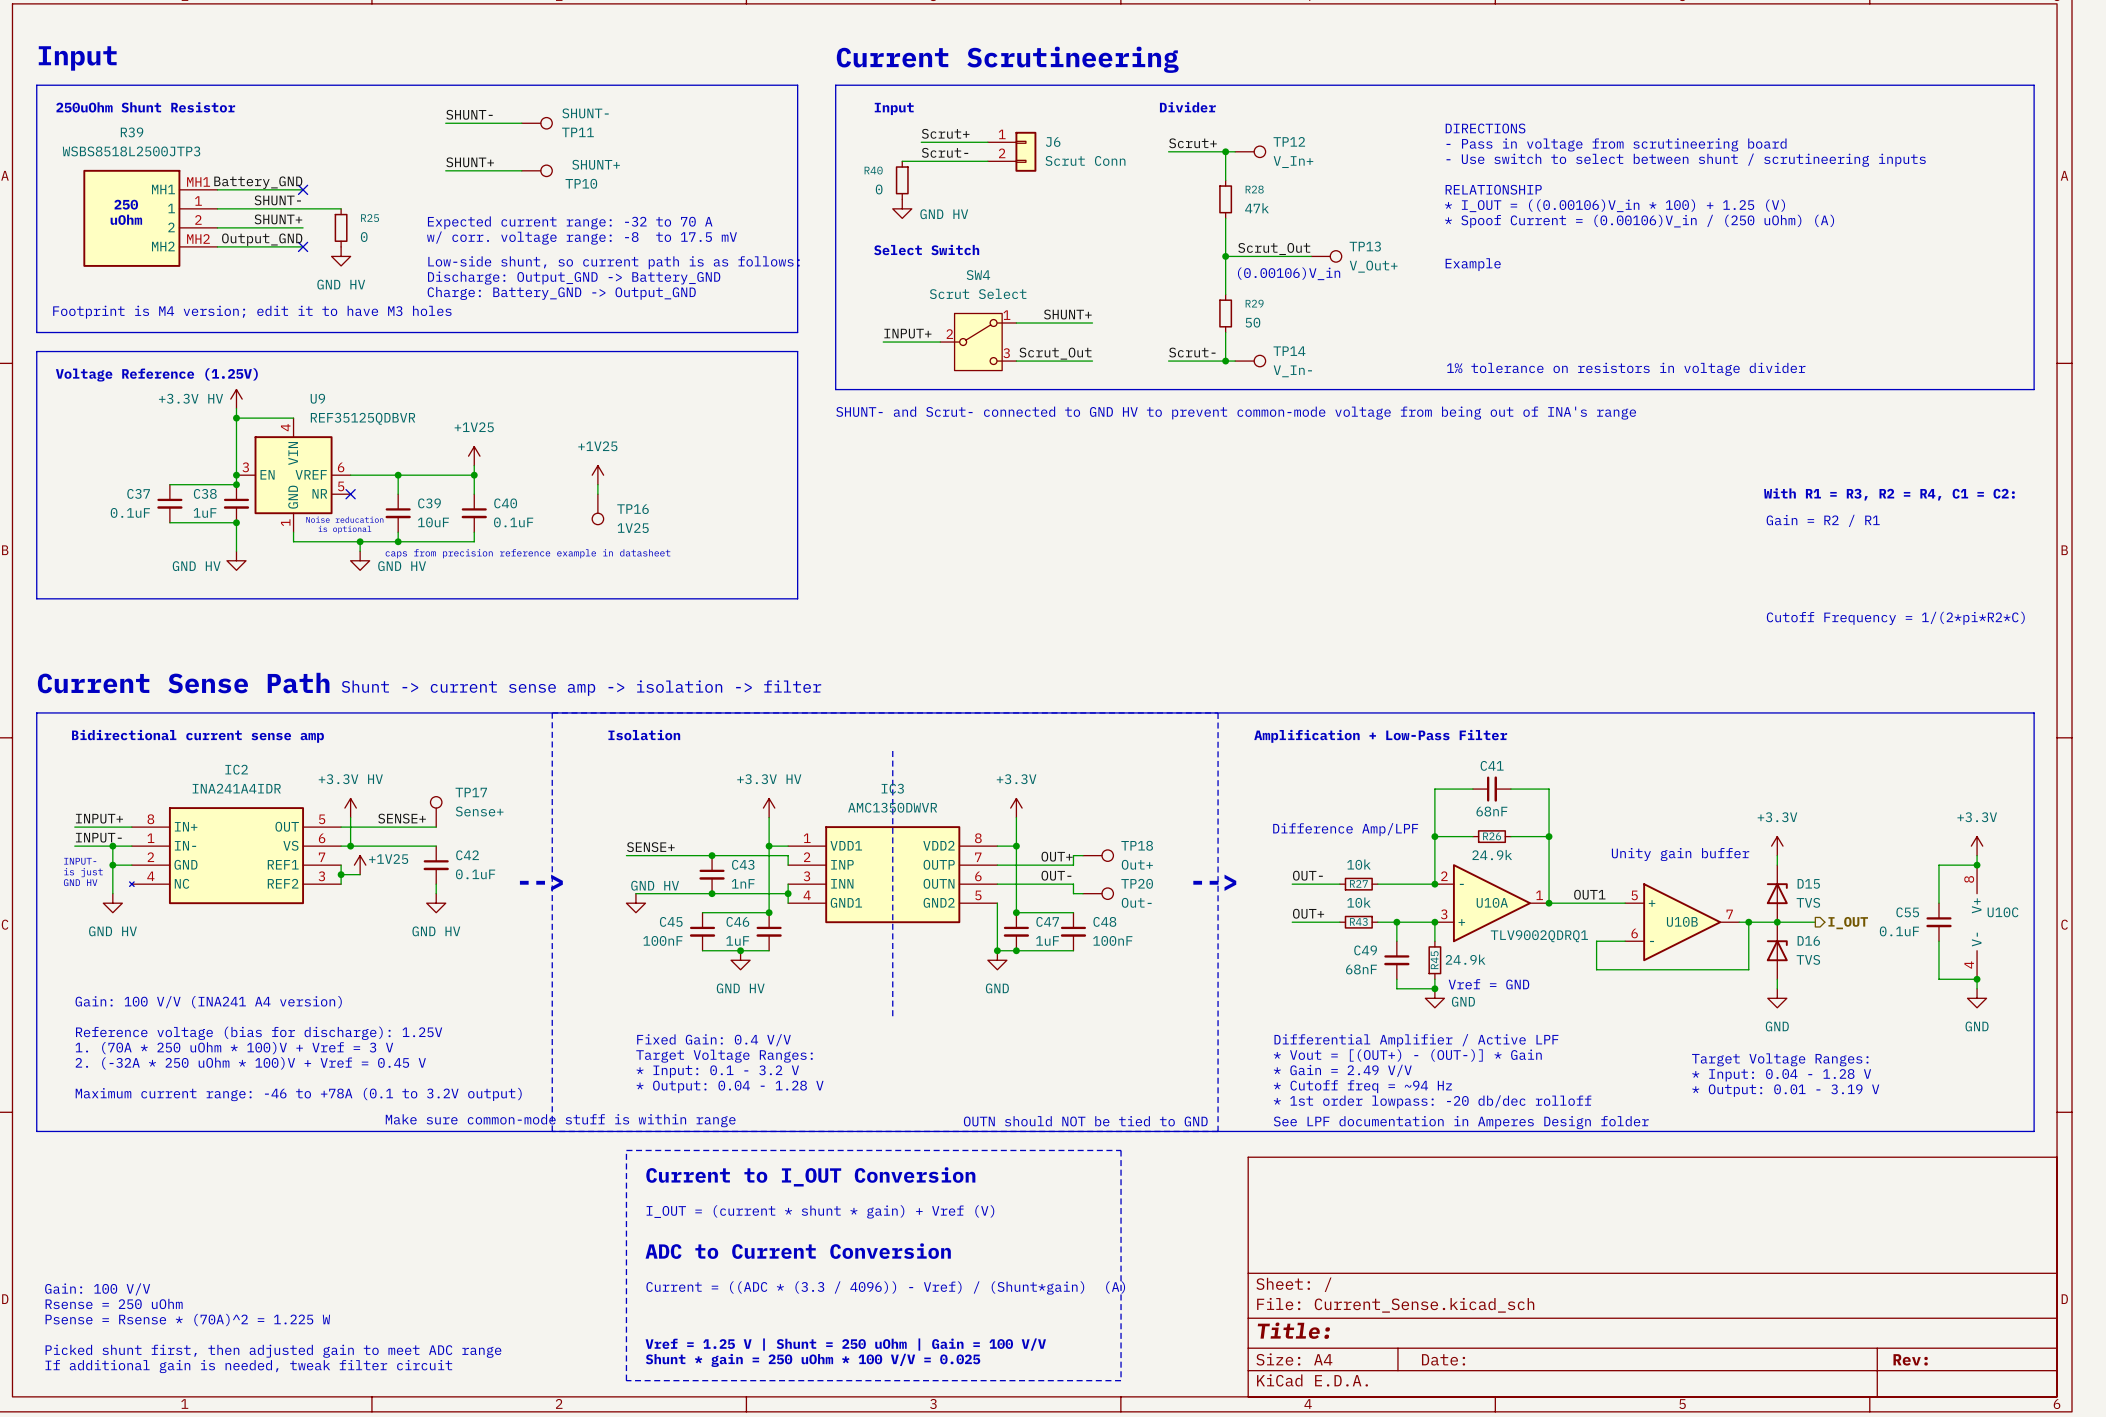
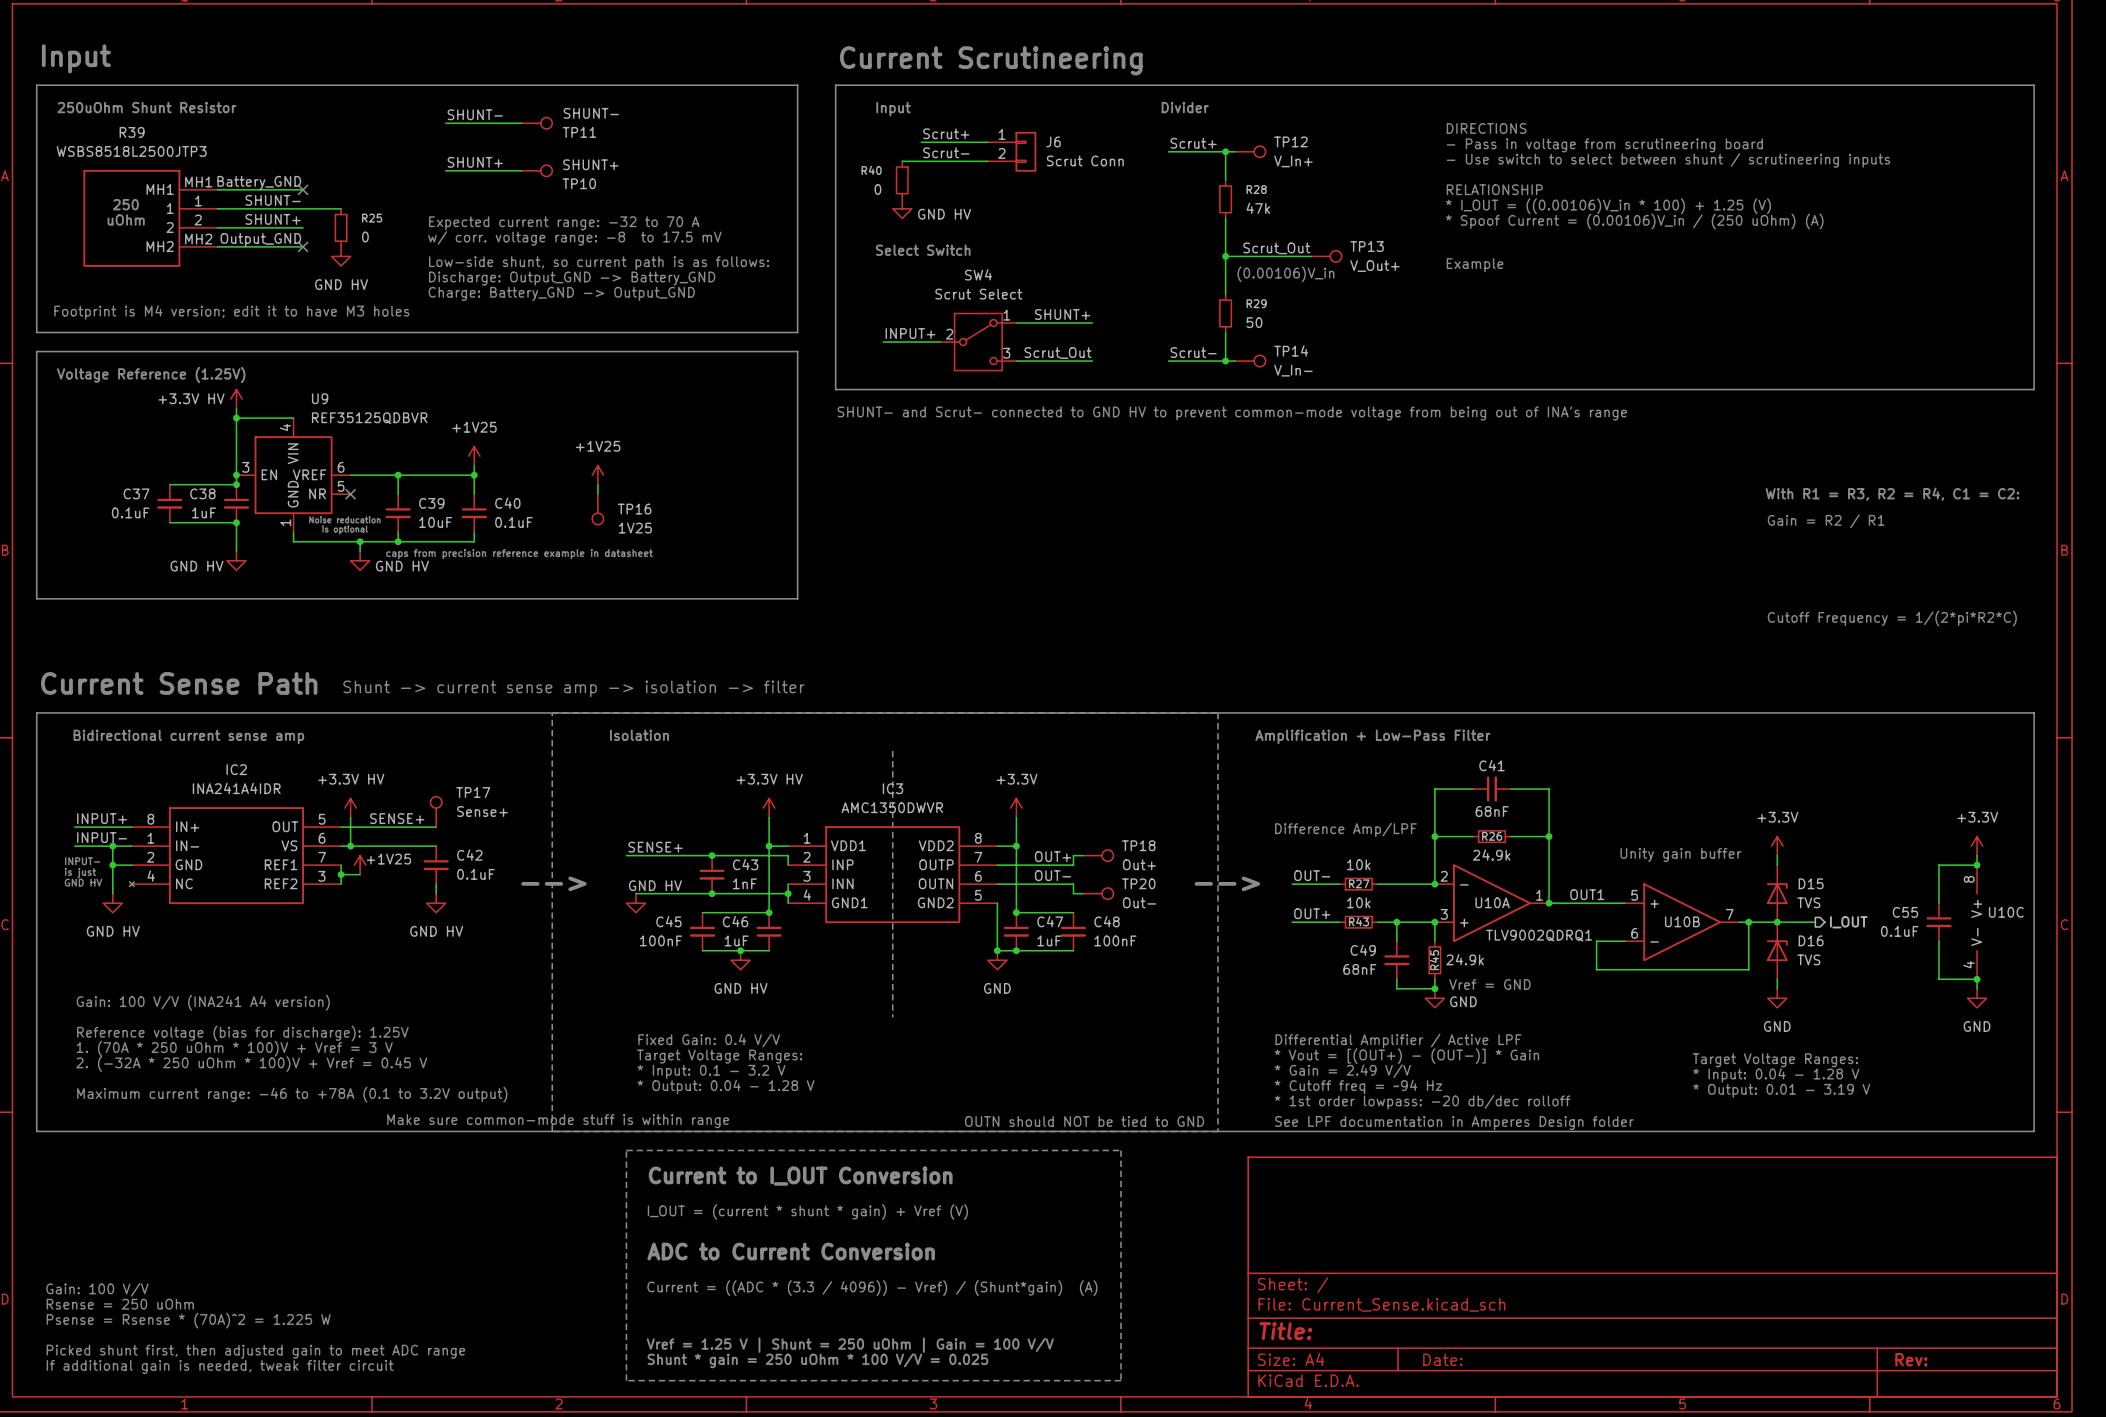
text: 1% tolerance on resistors in voltage divider (1626, 369) -> none

